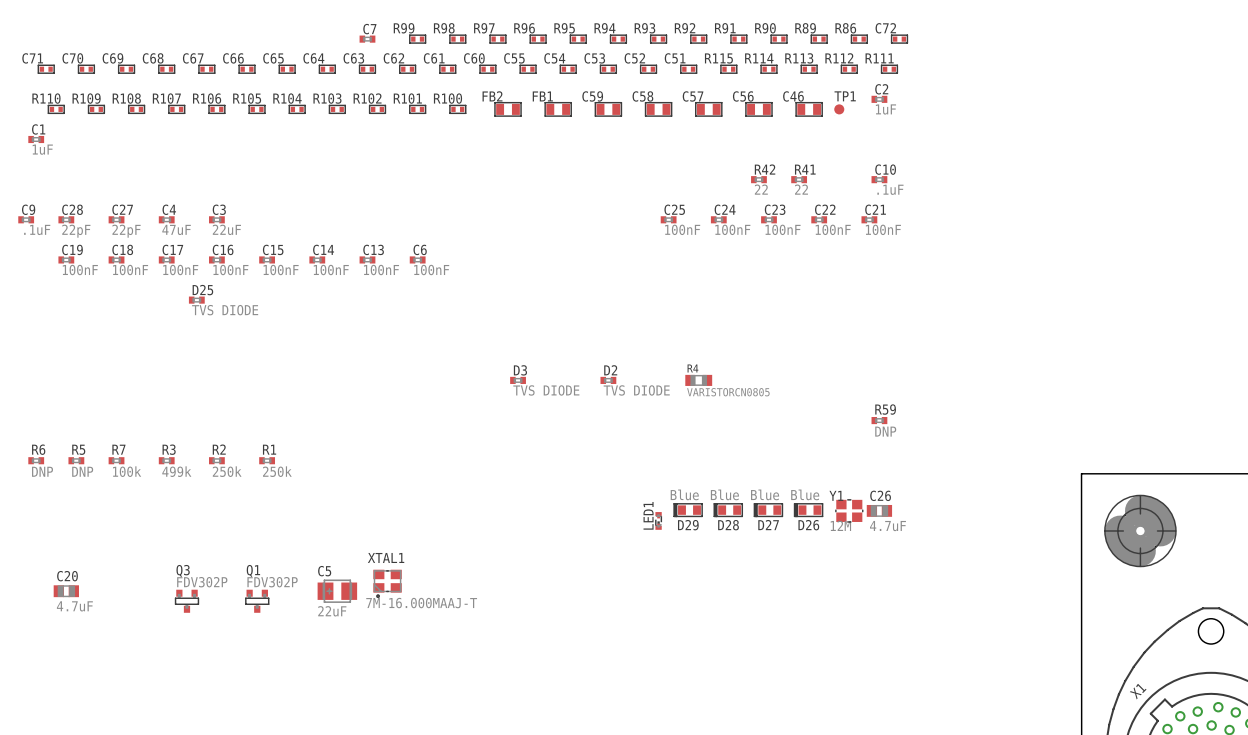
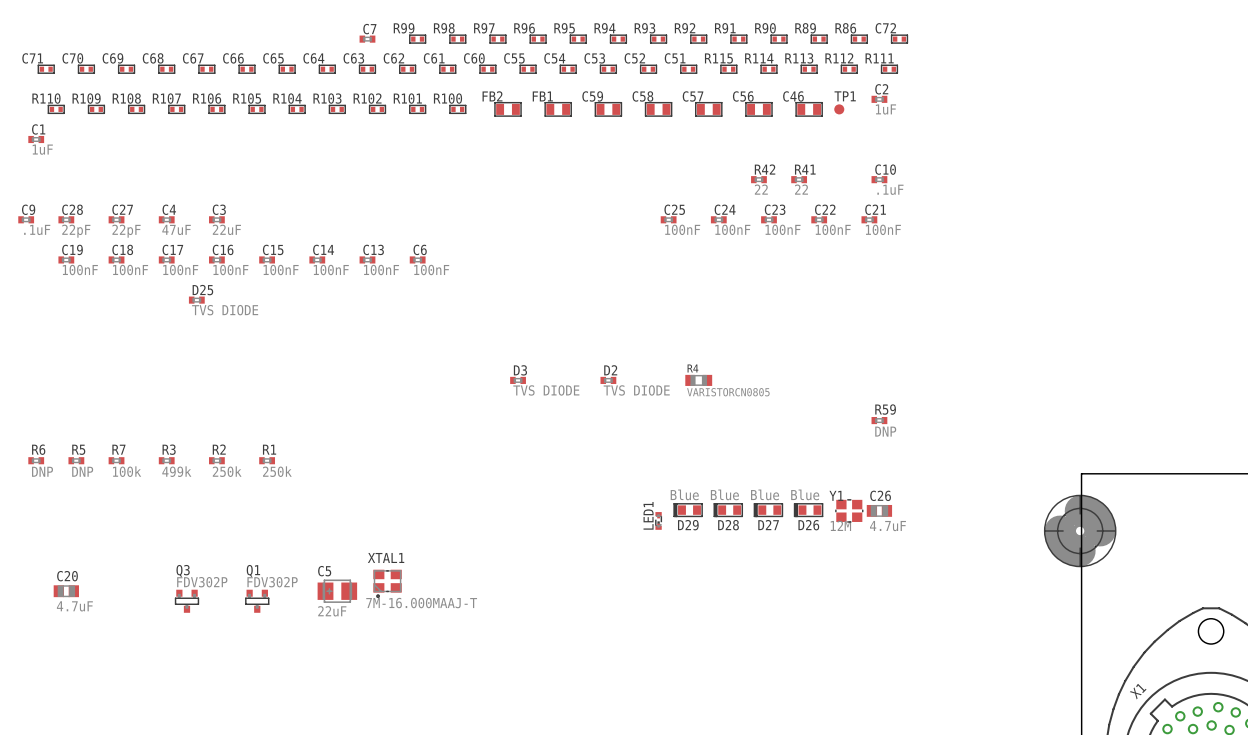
part position: (1140, 530) -> (1080, 530)

